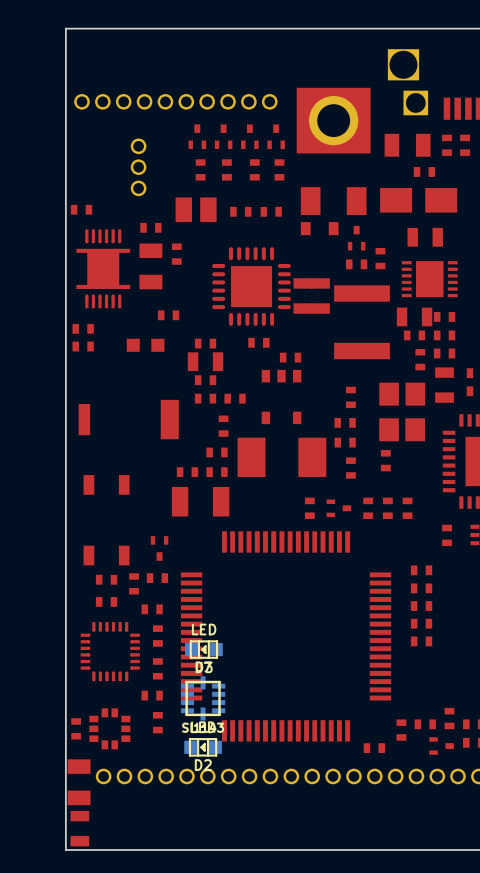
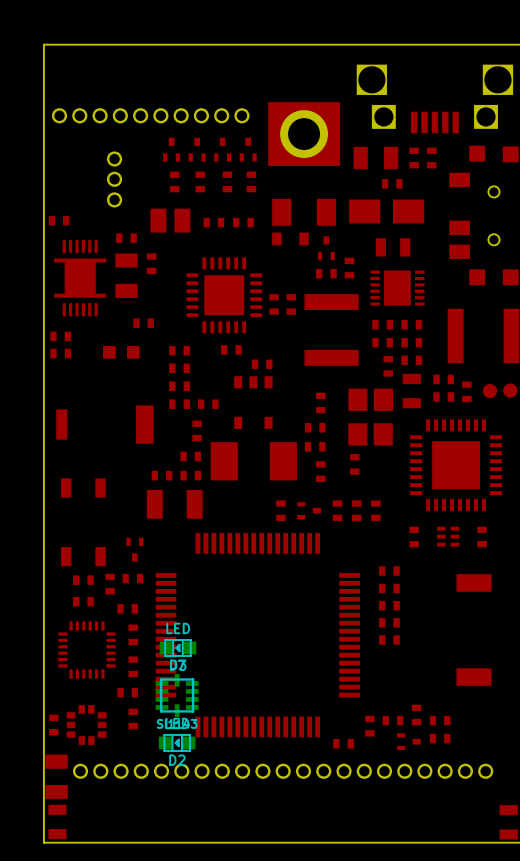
part footprint: [293, 278, 313, 314] -> [269, 294, 279, 315]
part footprint: [311, 278, 330, 314] -> [286, 294, 297, 315]
part footprint: [396, 307, 433, 327] -> [372, 320, 394, 330]
part footprint: [187, 352, 224, 372] -> [169, 363, 190, 374]

